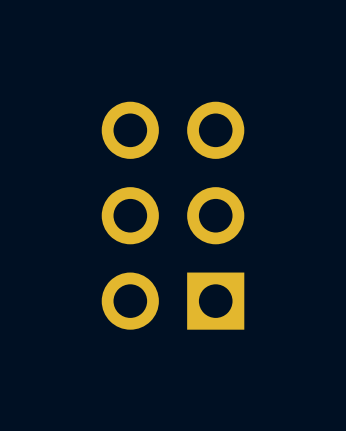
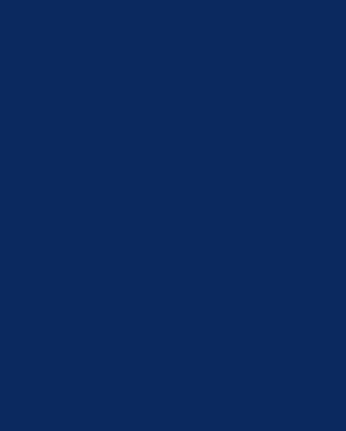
part: (173, 215) -> none

